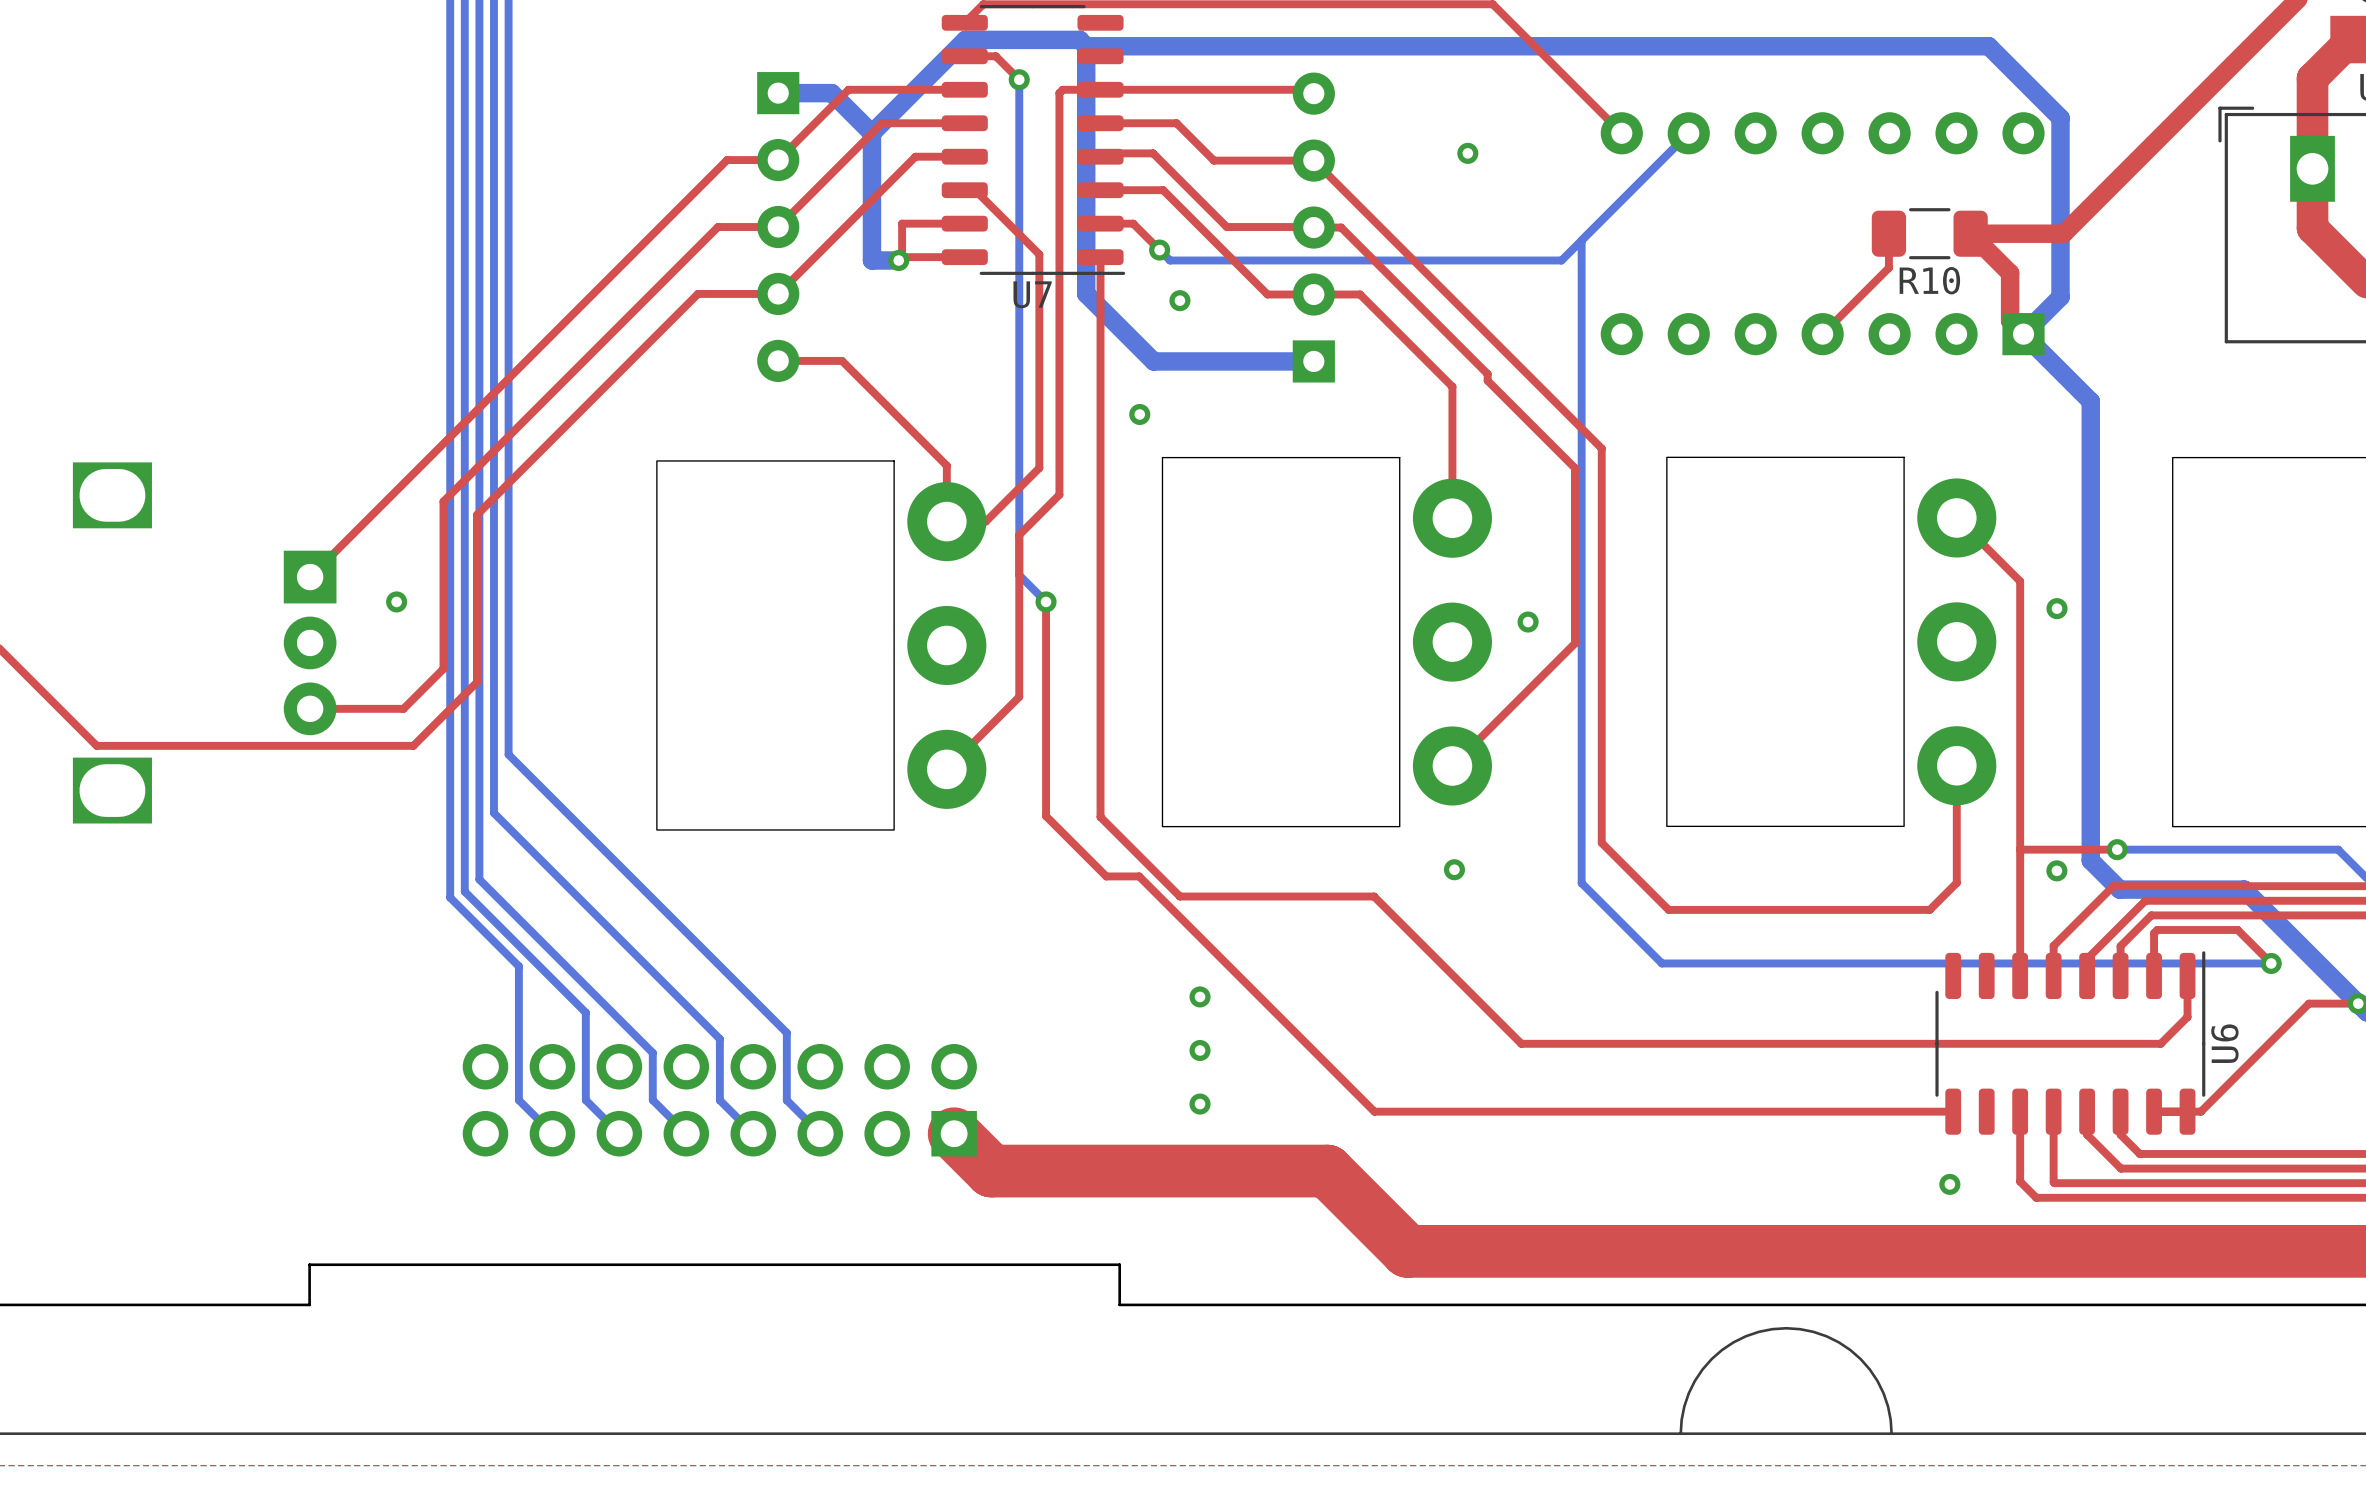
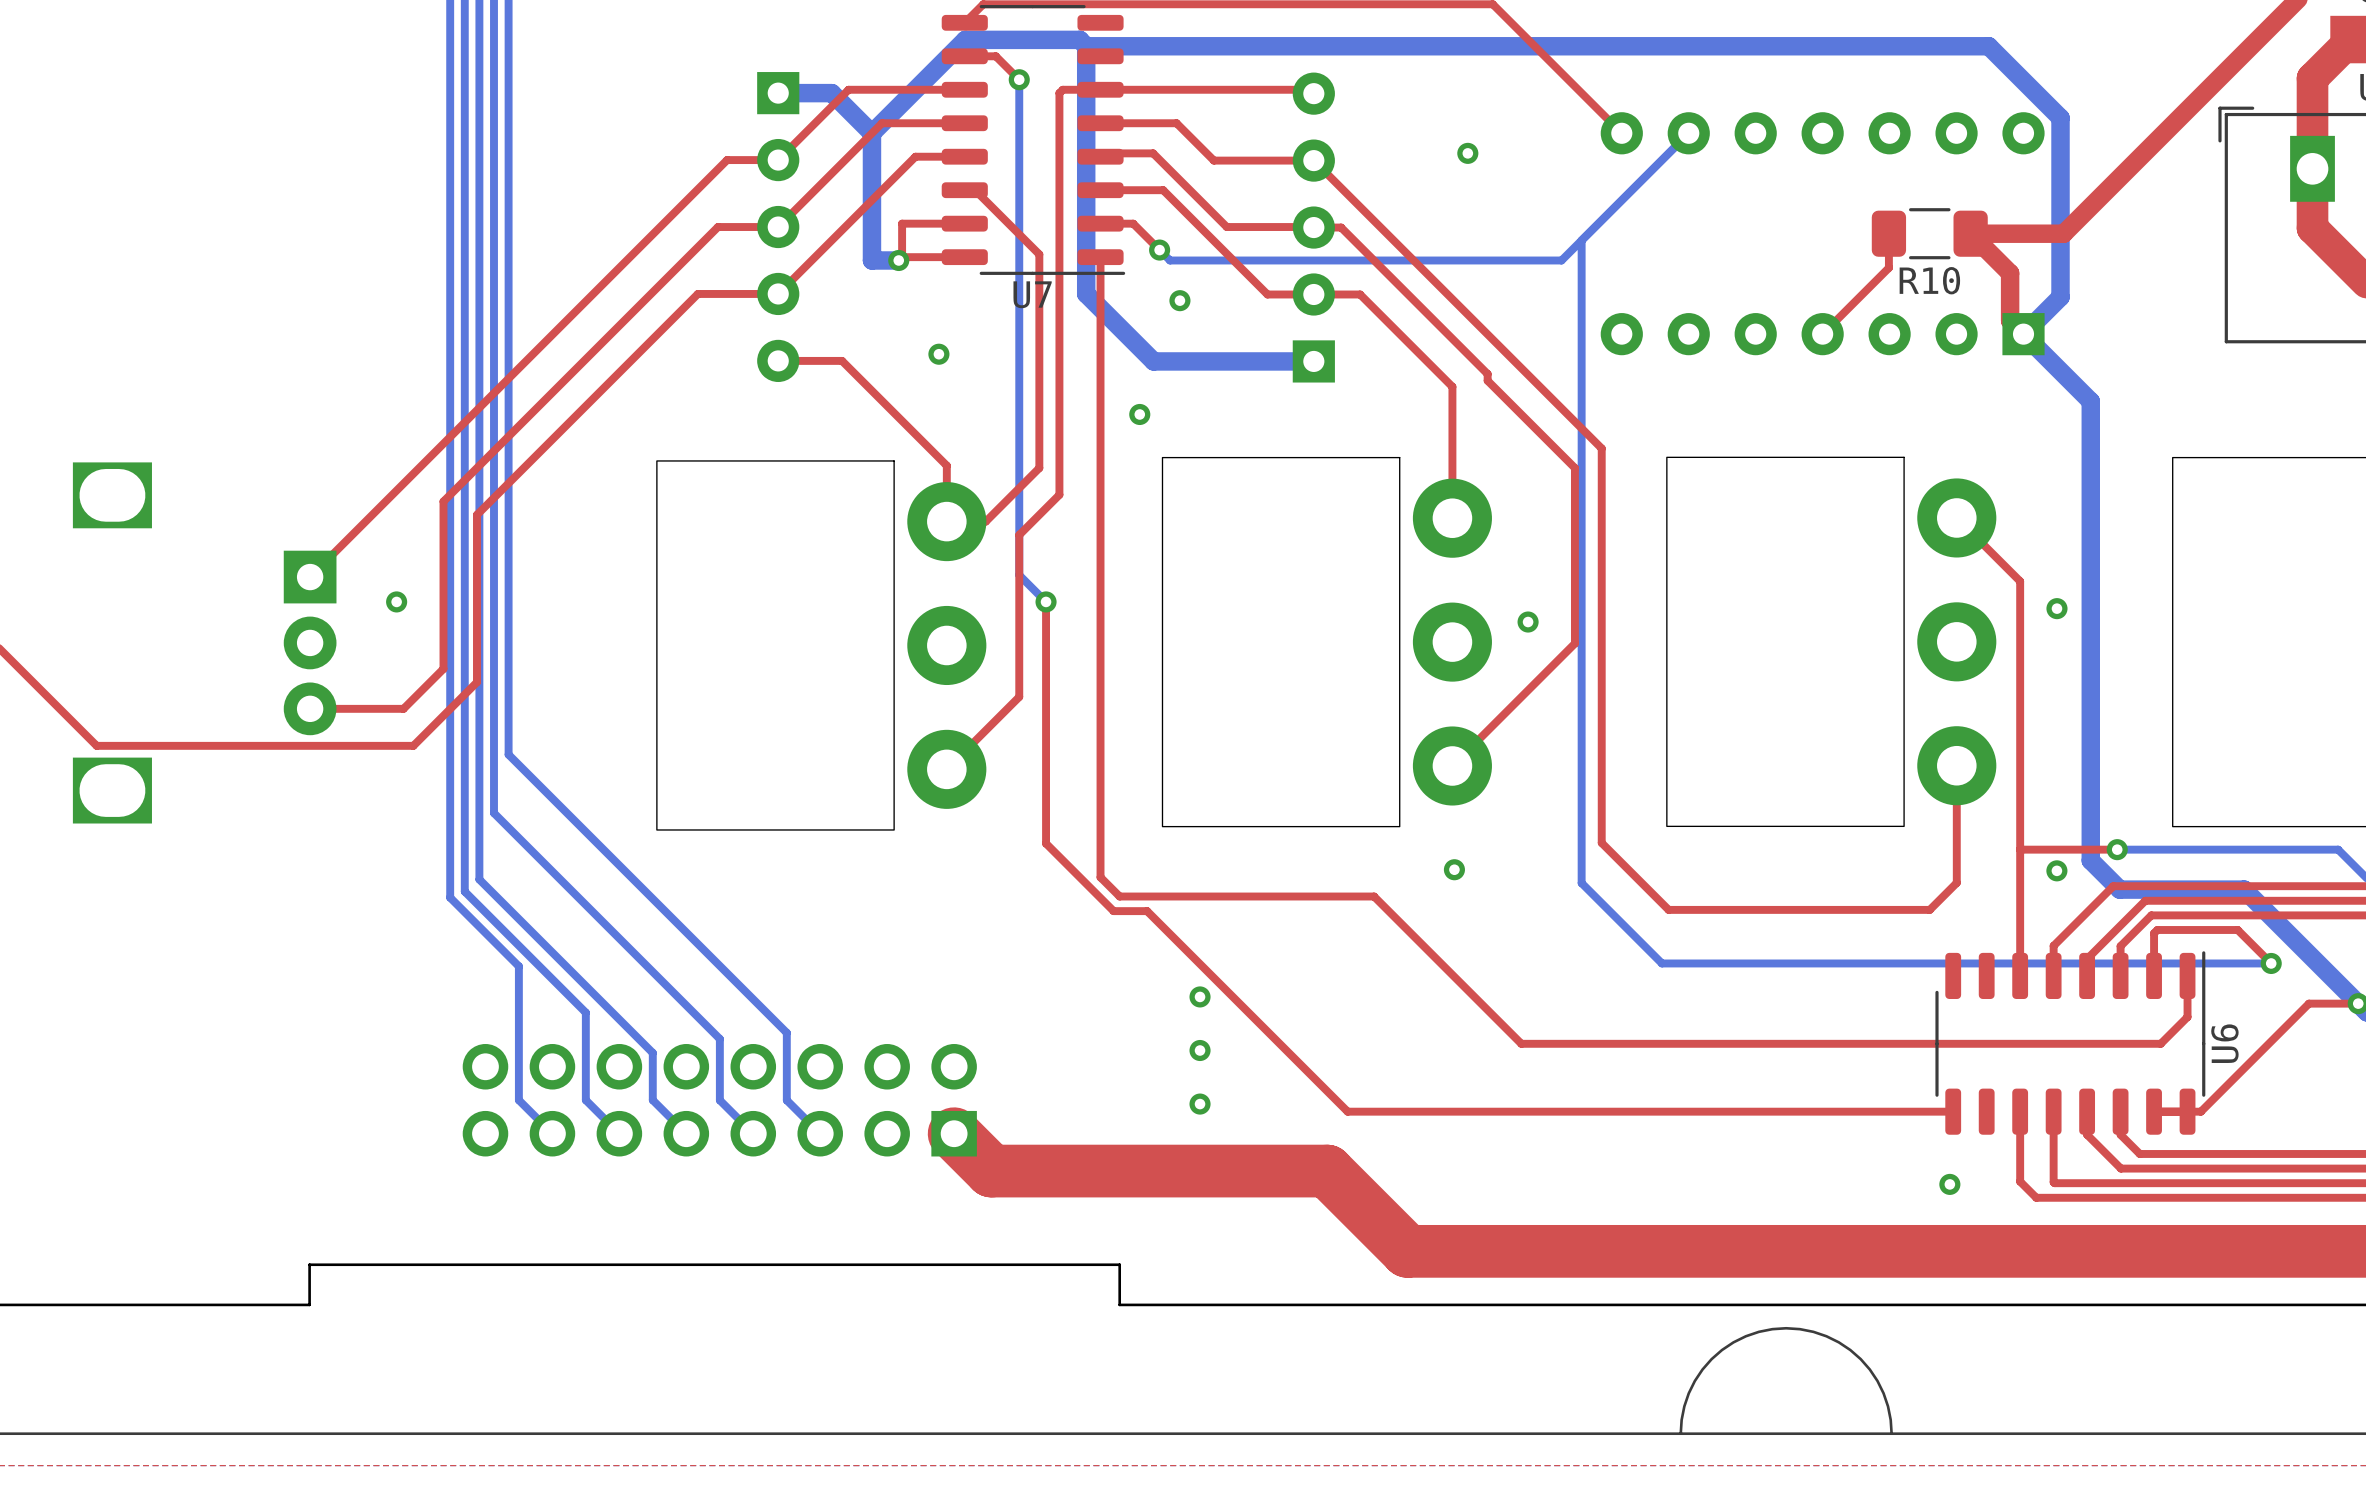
via: none -> (938, 354)
top track: (1046, 816) (1106, 876) (1139, 876) (1374, 1111) -> (1046, 816) (1046, 843) (1113, 911) (1147, 911) (1347, 1111) (1374, 1111)
top track: (1100, 817) (1179, 896) -> (1100, 817) (1100, 877) (1119, 896) (1179, 896)

